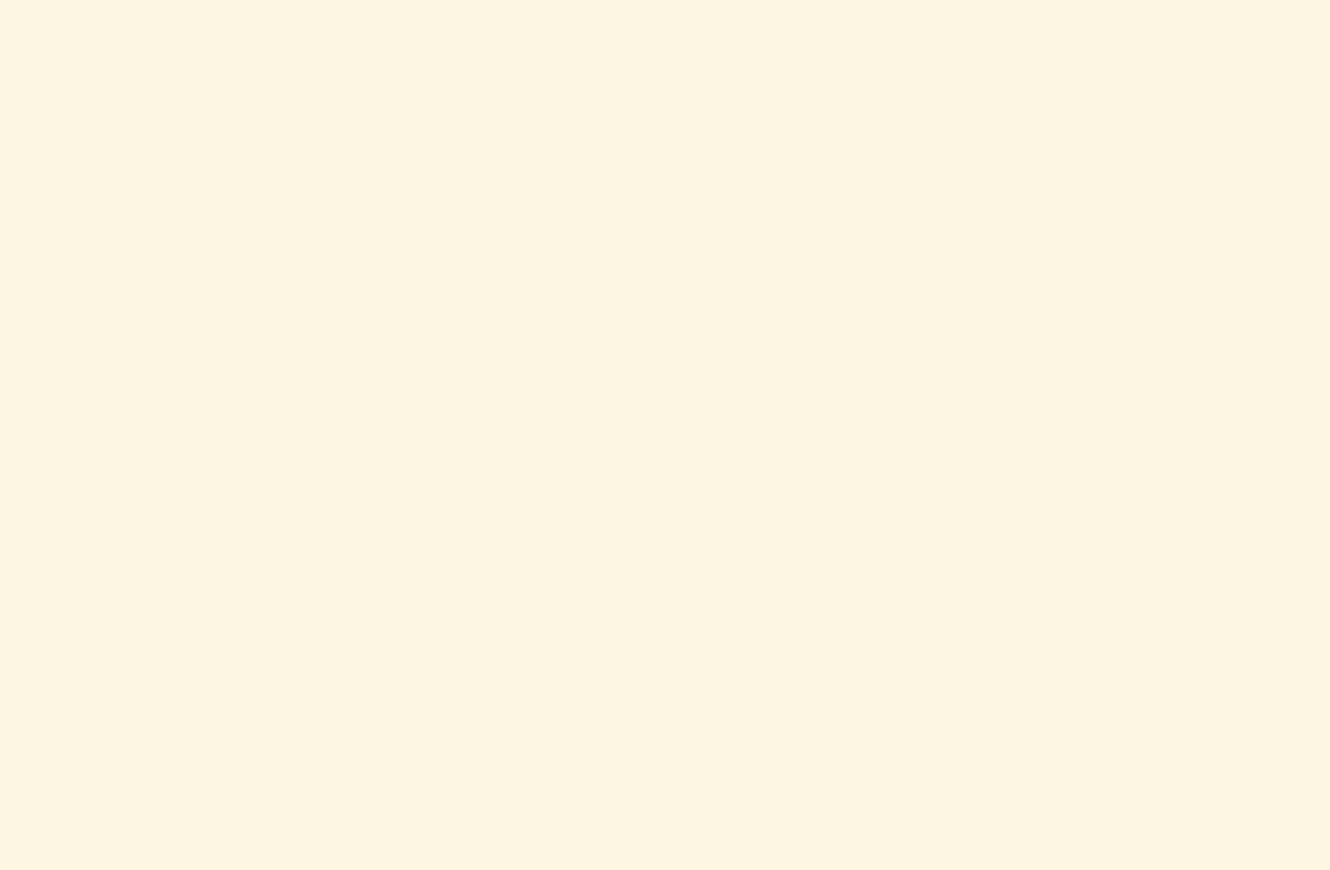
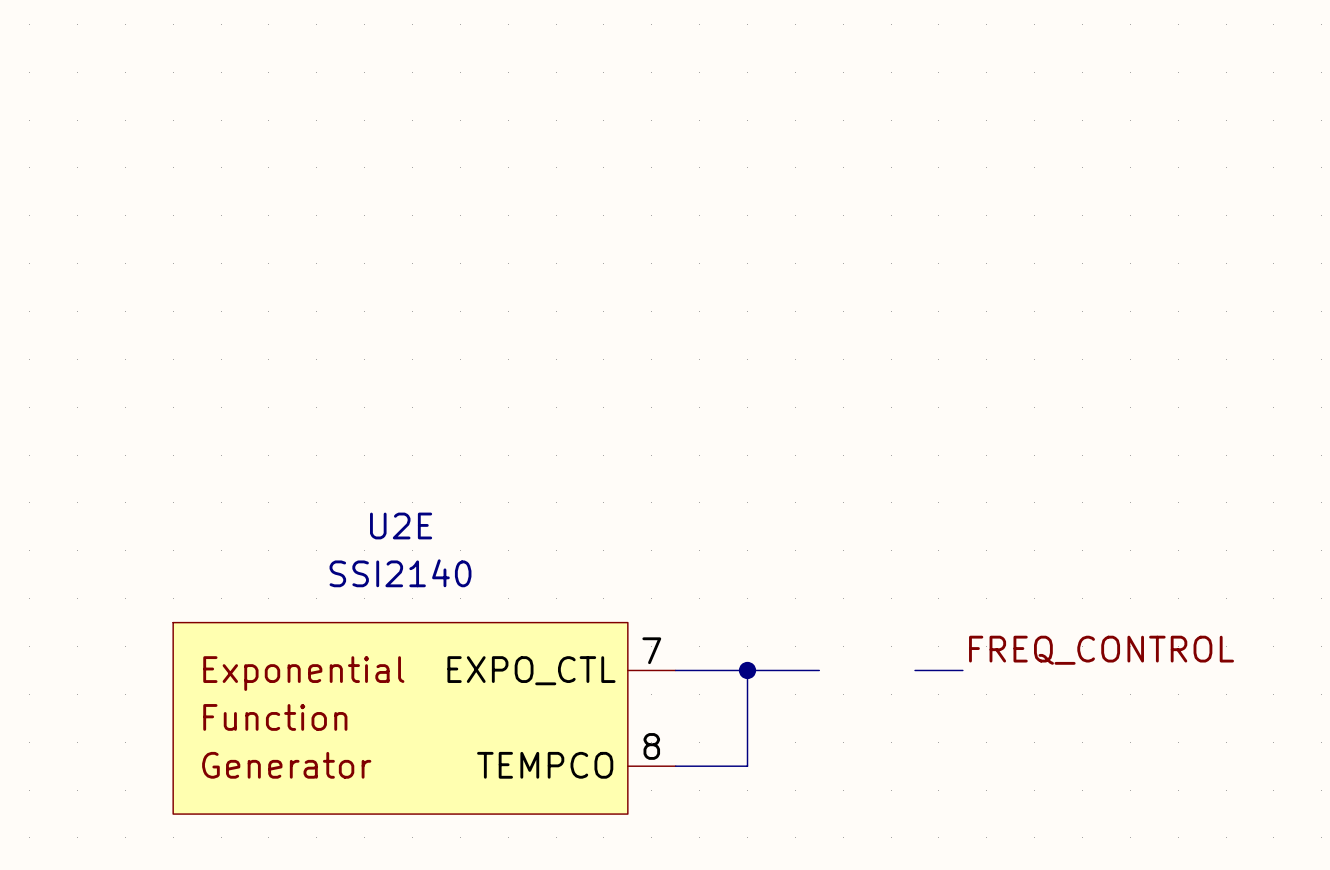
label: none -> FREQ_CONTROL (1101, 650)
wire: none -> (675, 670) (819, 670)
wire: none -> (747, 670) (747, 766) (675, 766)
junction: none -> (747, 670)
wire: none -> (915, 670) (962, 670)
U2E: none -> SSI2140 (424, 718)

